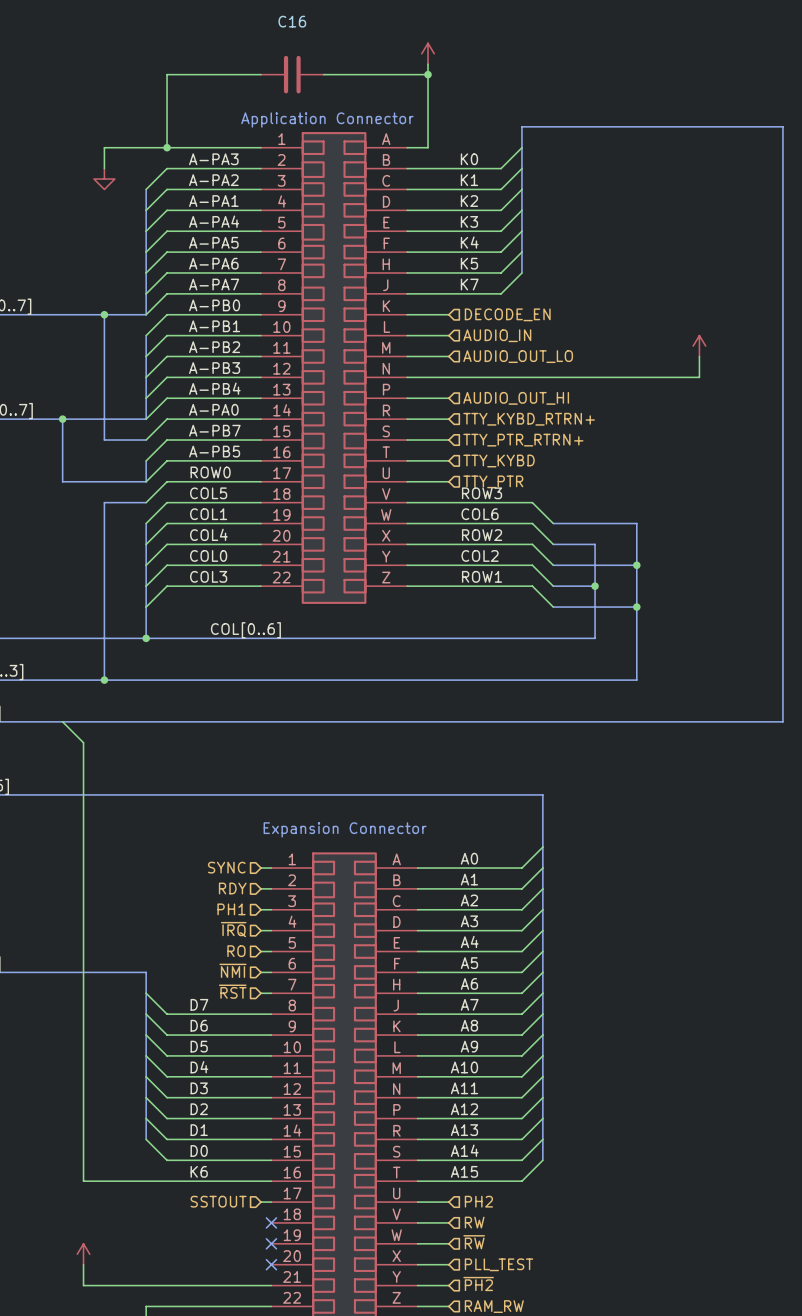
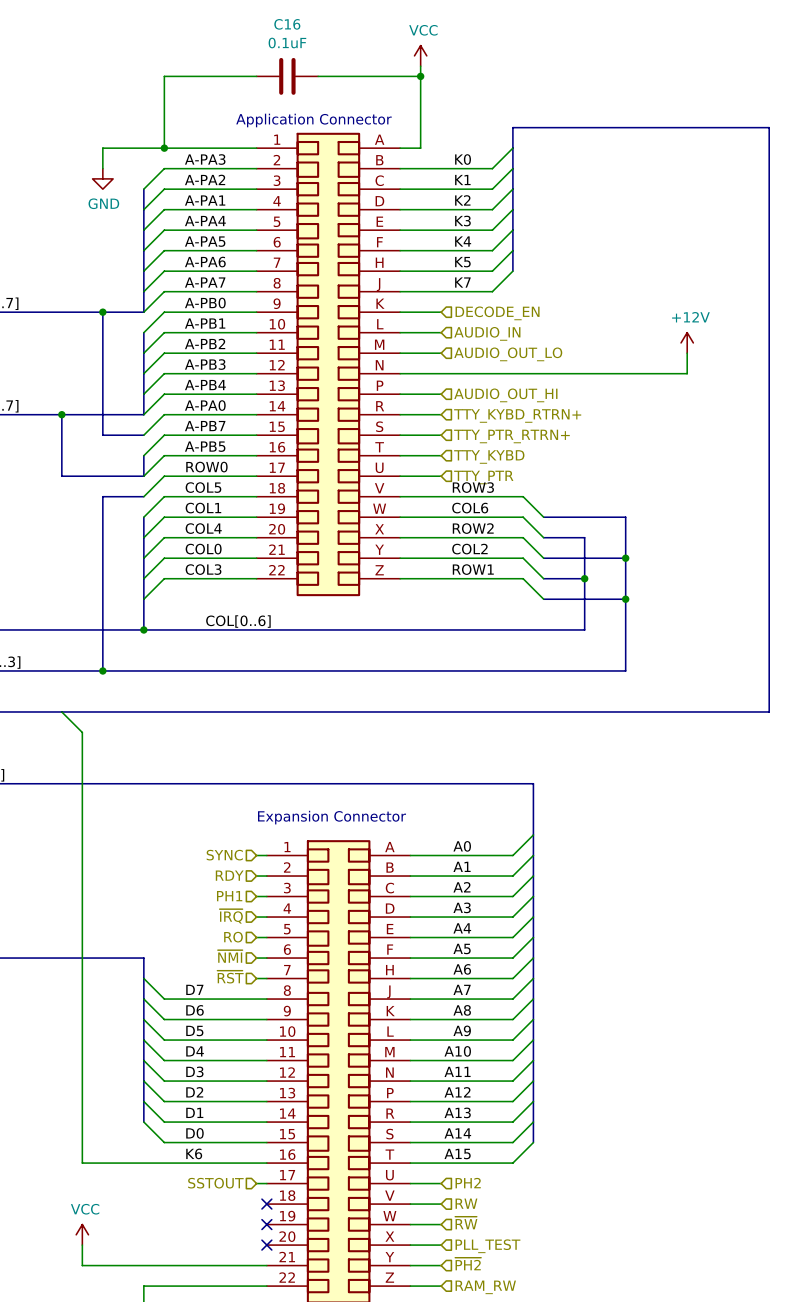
power symbol text: none -> VCC (423, 30)
C16 value: none -> 0.1uF (287, 43)
power symbol text: none -> GND (103, 203)
power symbol text: none -> +12V (690, 317)
power symbol text: none -> VCC (85, 1209)

